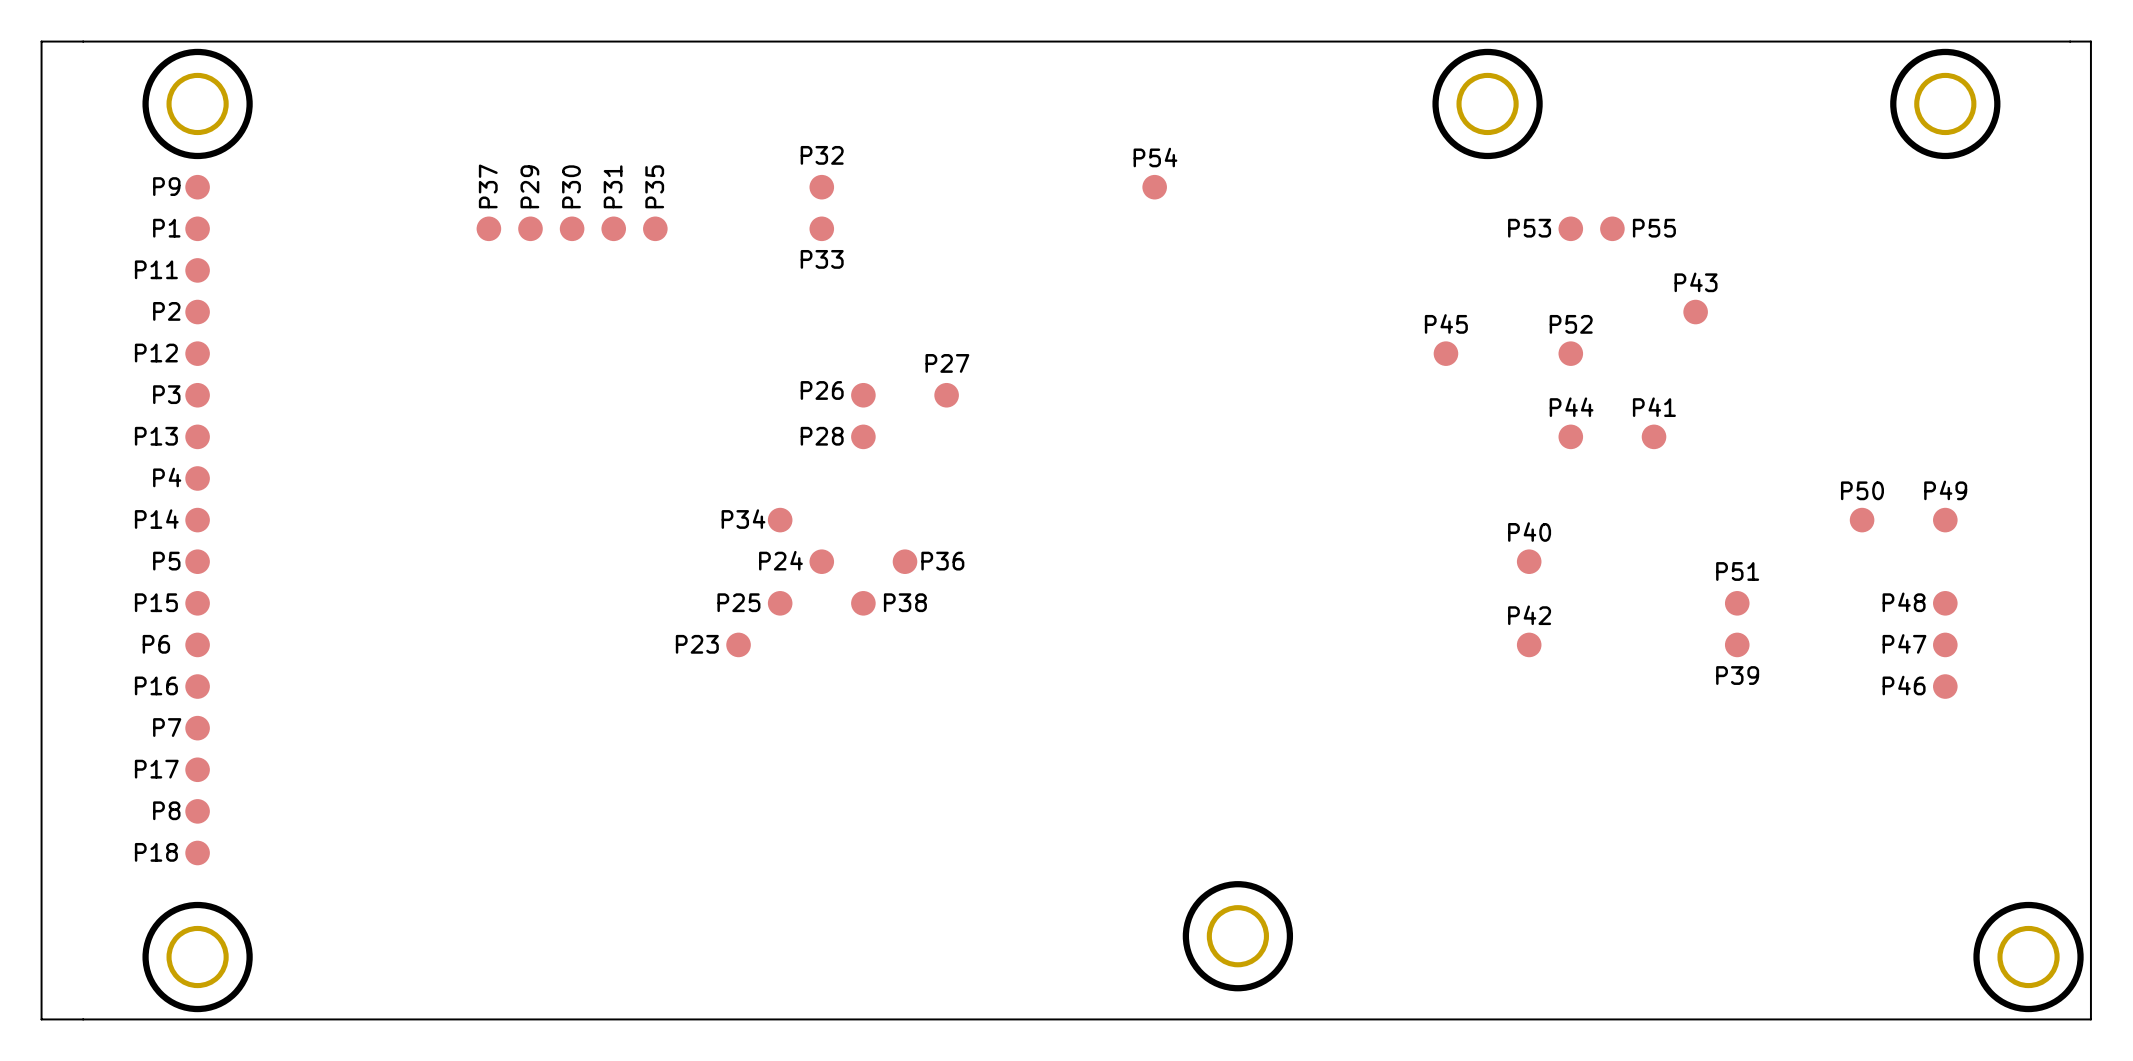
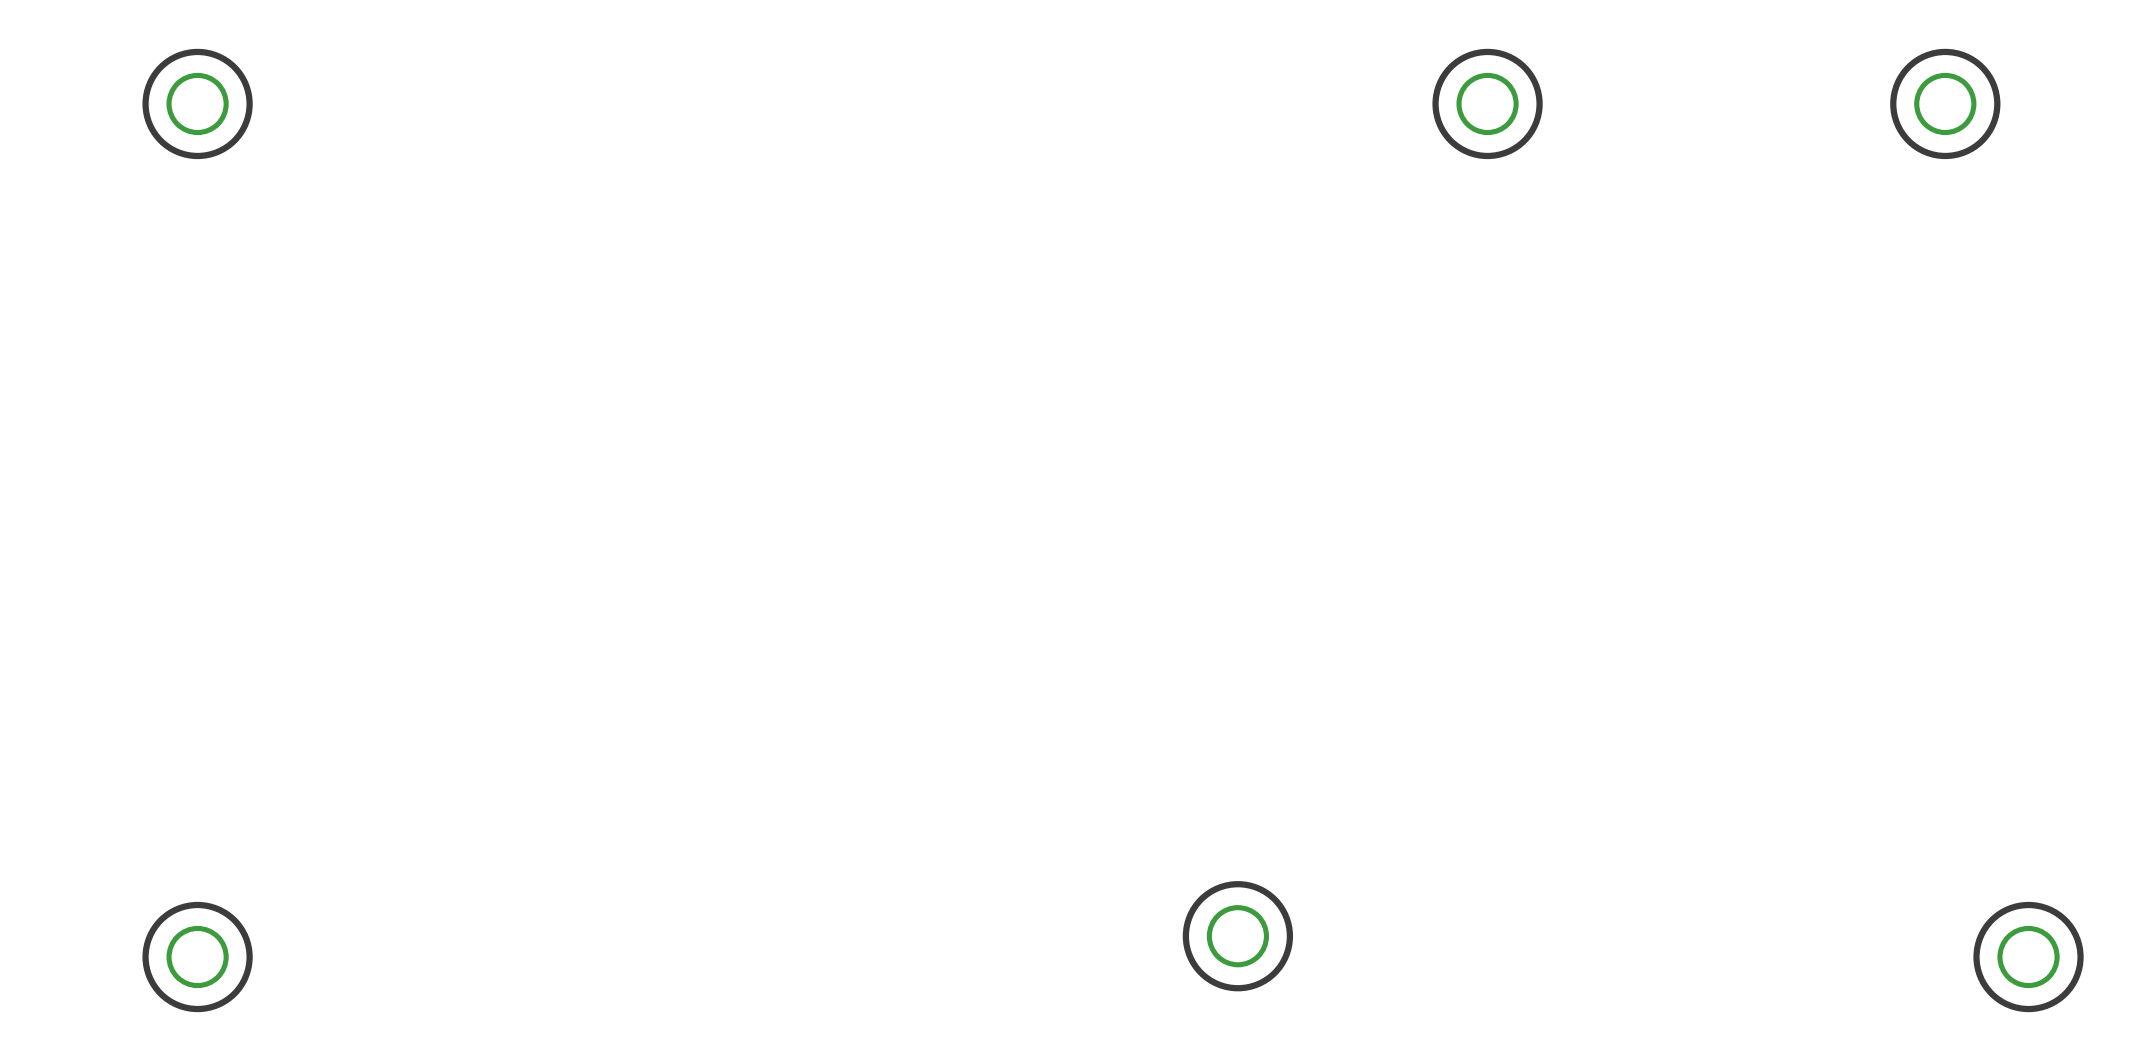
board edge: (41, 41) (2090, 41) (2090, 1019) (41, 1019) (41, 41) -> none
P9: (197, 187) -> none
P32: (821, 187) -> none
P54: (1154, 187) -> none
P1: (197, 228) -> none
P37: (488, 228) -> none
P29: (530, 228) -> none
P30: (572, 228) -> none
P31: (613, 228) -> none
P35: (655, 228) -> none
P33: (821, 228) -> none
P53: (1570, 228) -> none
P55: (1612, 228) -> none
P11: (197, 270) -> none
P2: (197, 312) -> none
P43: (1695, 312) -> none
P12: (197, 353) -> none
P45: (1445, 353) -> none
P52: (1570, 353) -> none
P3: (197, 395) -> none
P26: (863, 395) -> none
P27: (946, 395) -> none
P13: (197, 436) -> none
P28: (863, 436) -> none
P44: (1570, 436) -> none
P41: (1654, 436) -> none
P4: (197, 478) -> none
P14: (197, 520) -> none
P34: (780, 520) -> none
P50: (1862, 520) -> none
P49: (1945, 520) -> none
P5: (197, 561) -> none
P24: (821, 561) -> none
P36: (905, 561) -> none
P40: (1529, 561) -> none
P15: (197, 603) -> none
P25: (780, 603) -> none
P38: (863, 603) -> none
P51: (1737, 603) -> none
P48: (1945, 603) -> none
P6: (197, 644) -> none
P23: (738, 644) -> none
P42: (1529, 644) -> none
P39: (1737, 644) -> none
P47: (1945, 644) -> none
P16: (197, 686) -> none
P46: (1945, 686) -> none
P7: (197, 728) -> none
P17: (197, 769) -> none
P8: (197, 811) -> none
P18: (197, 852) -> none

